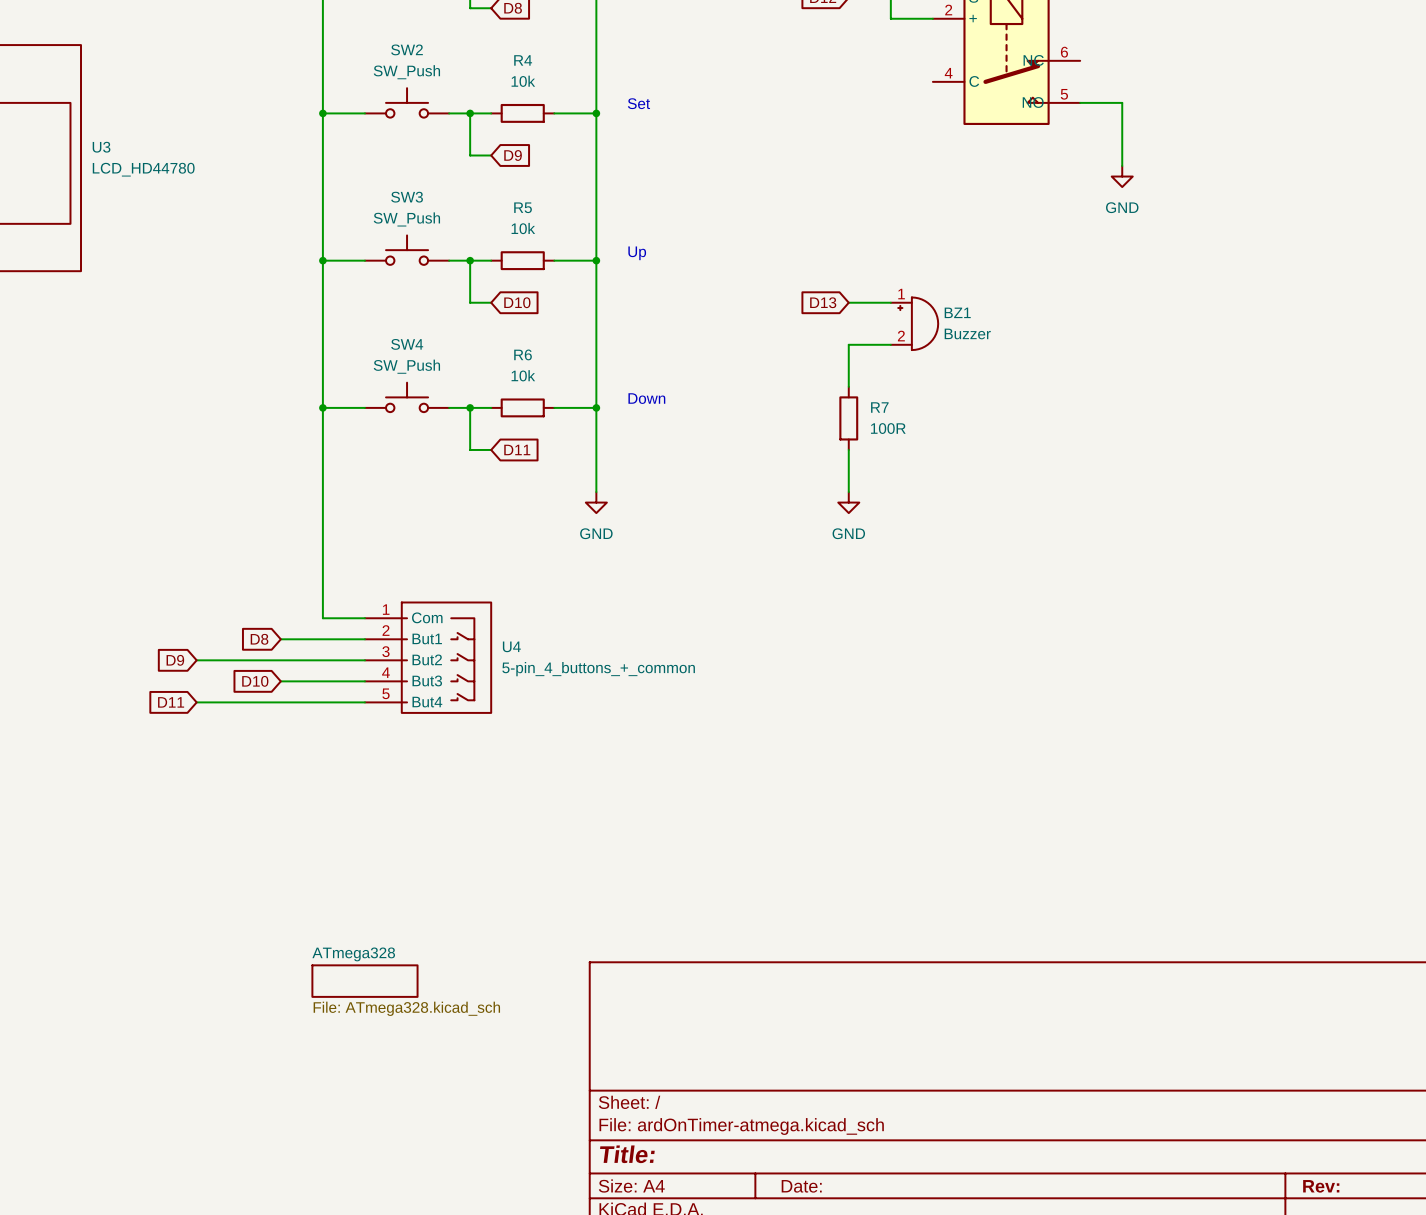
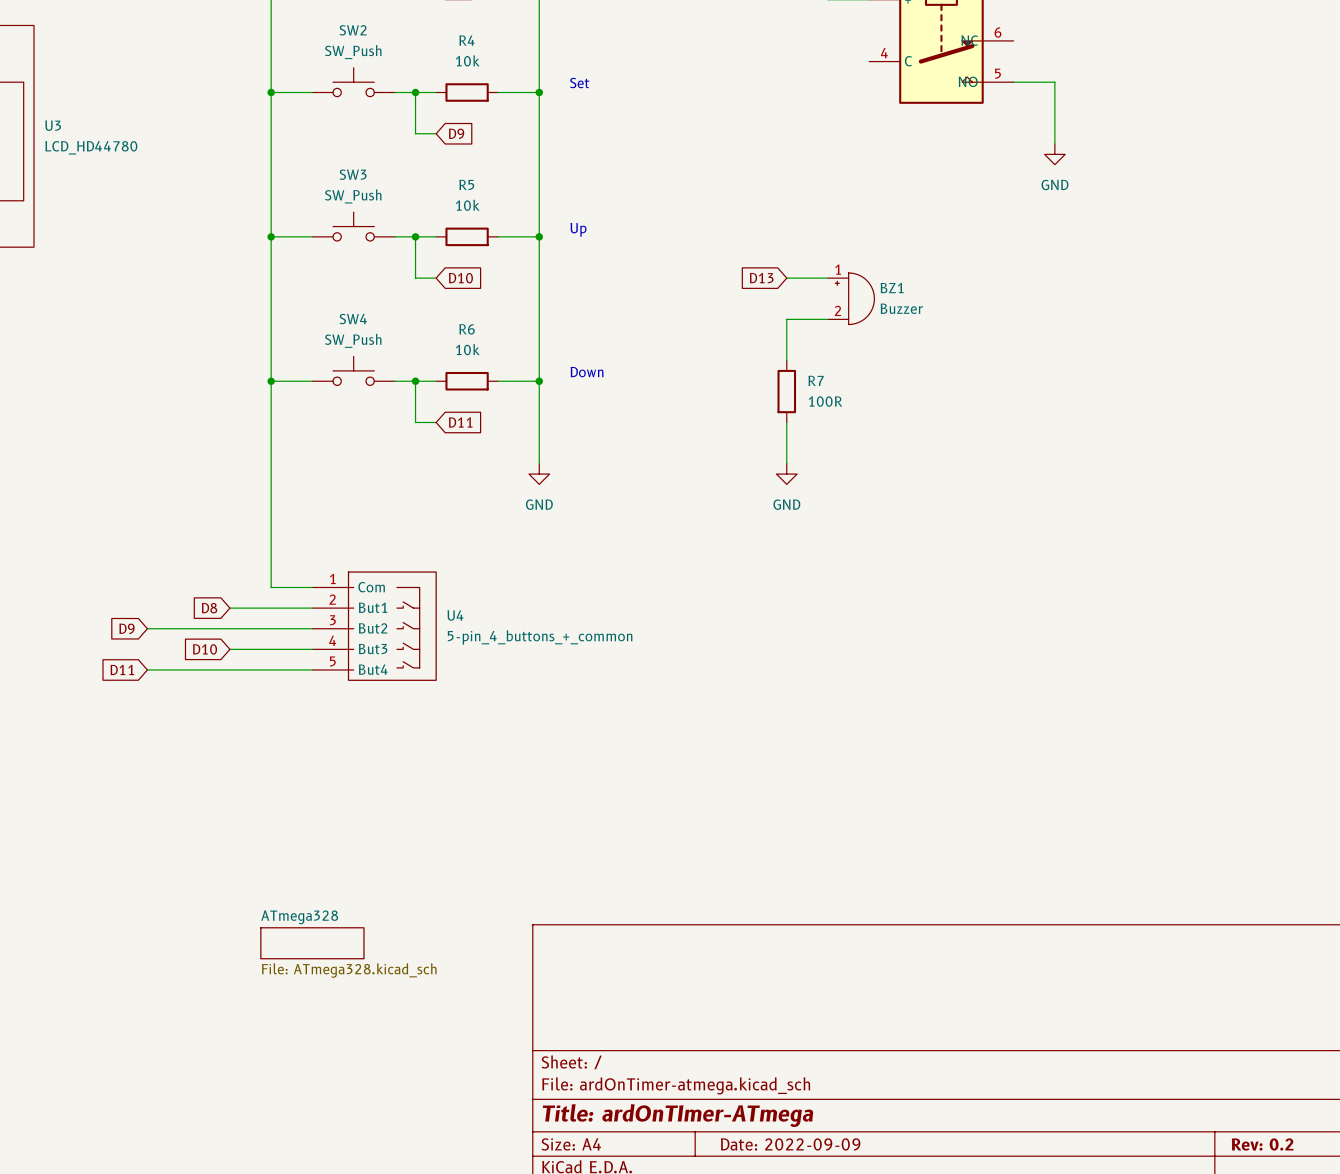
title block: Title: (627, 1154) -> Title: ardOnTImer-ATmega (677, 1115)
title block: Date: (801, 1186) -> Date: 2022-09-09 (790, 1144)
title block: Rev: (1321, 1186) -> Rev: 0.2 (1262, 1144)

